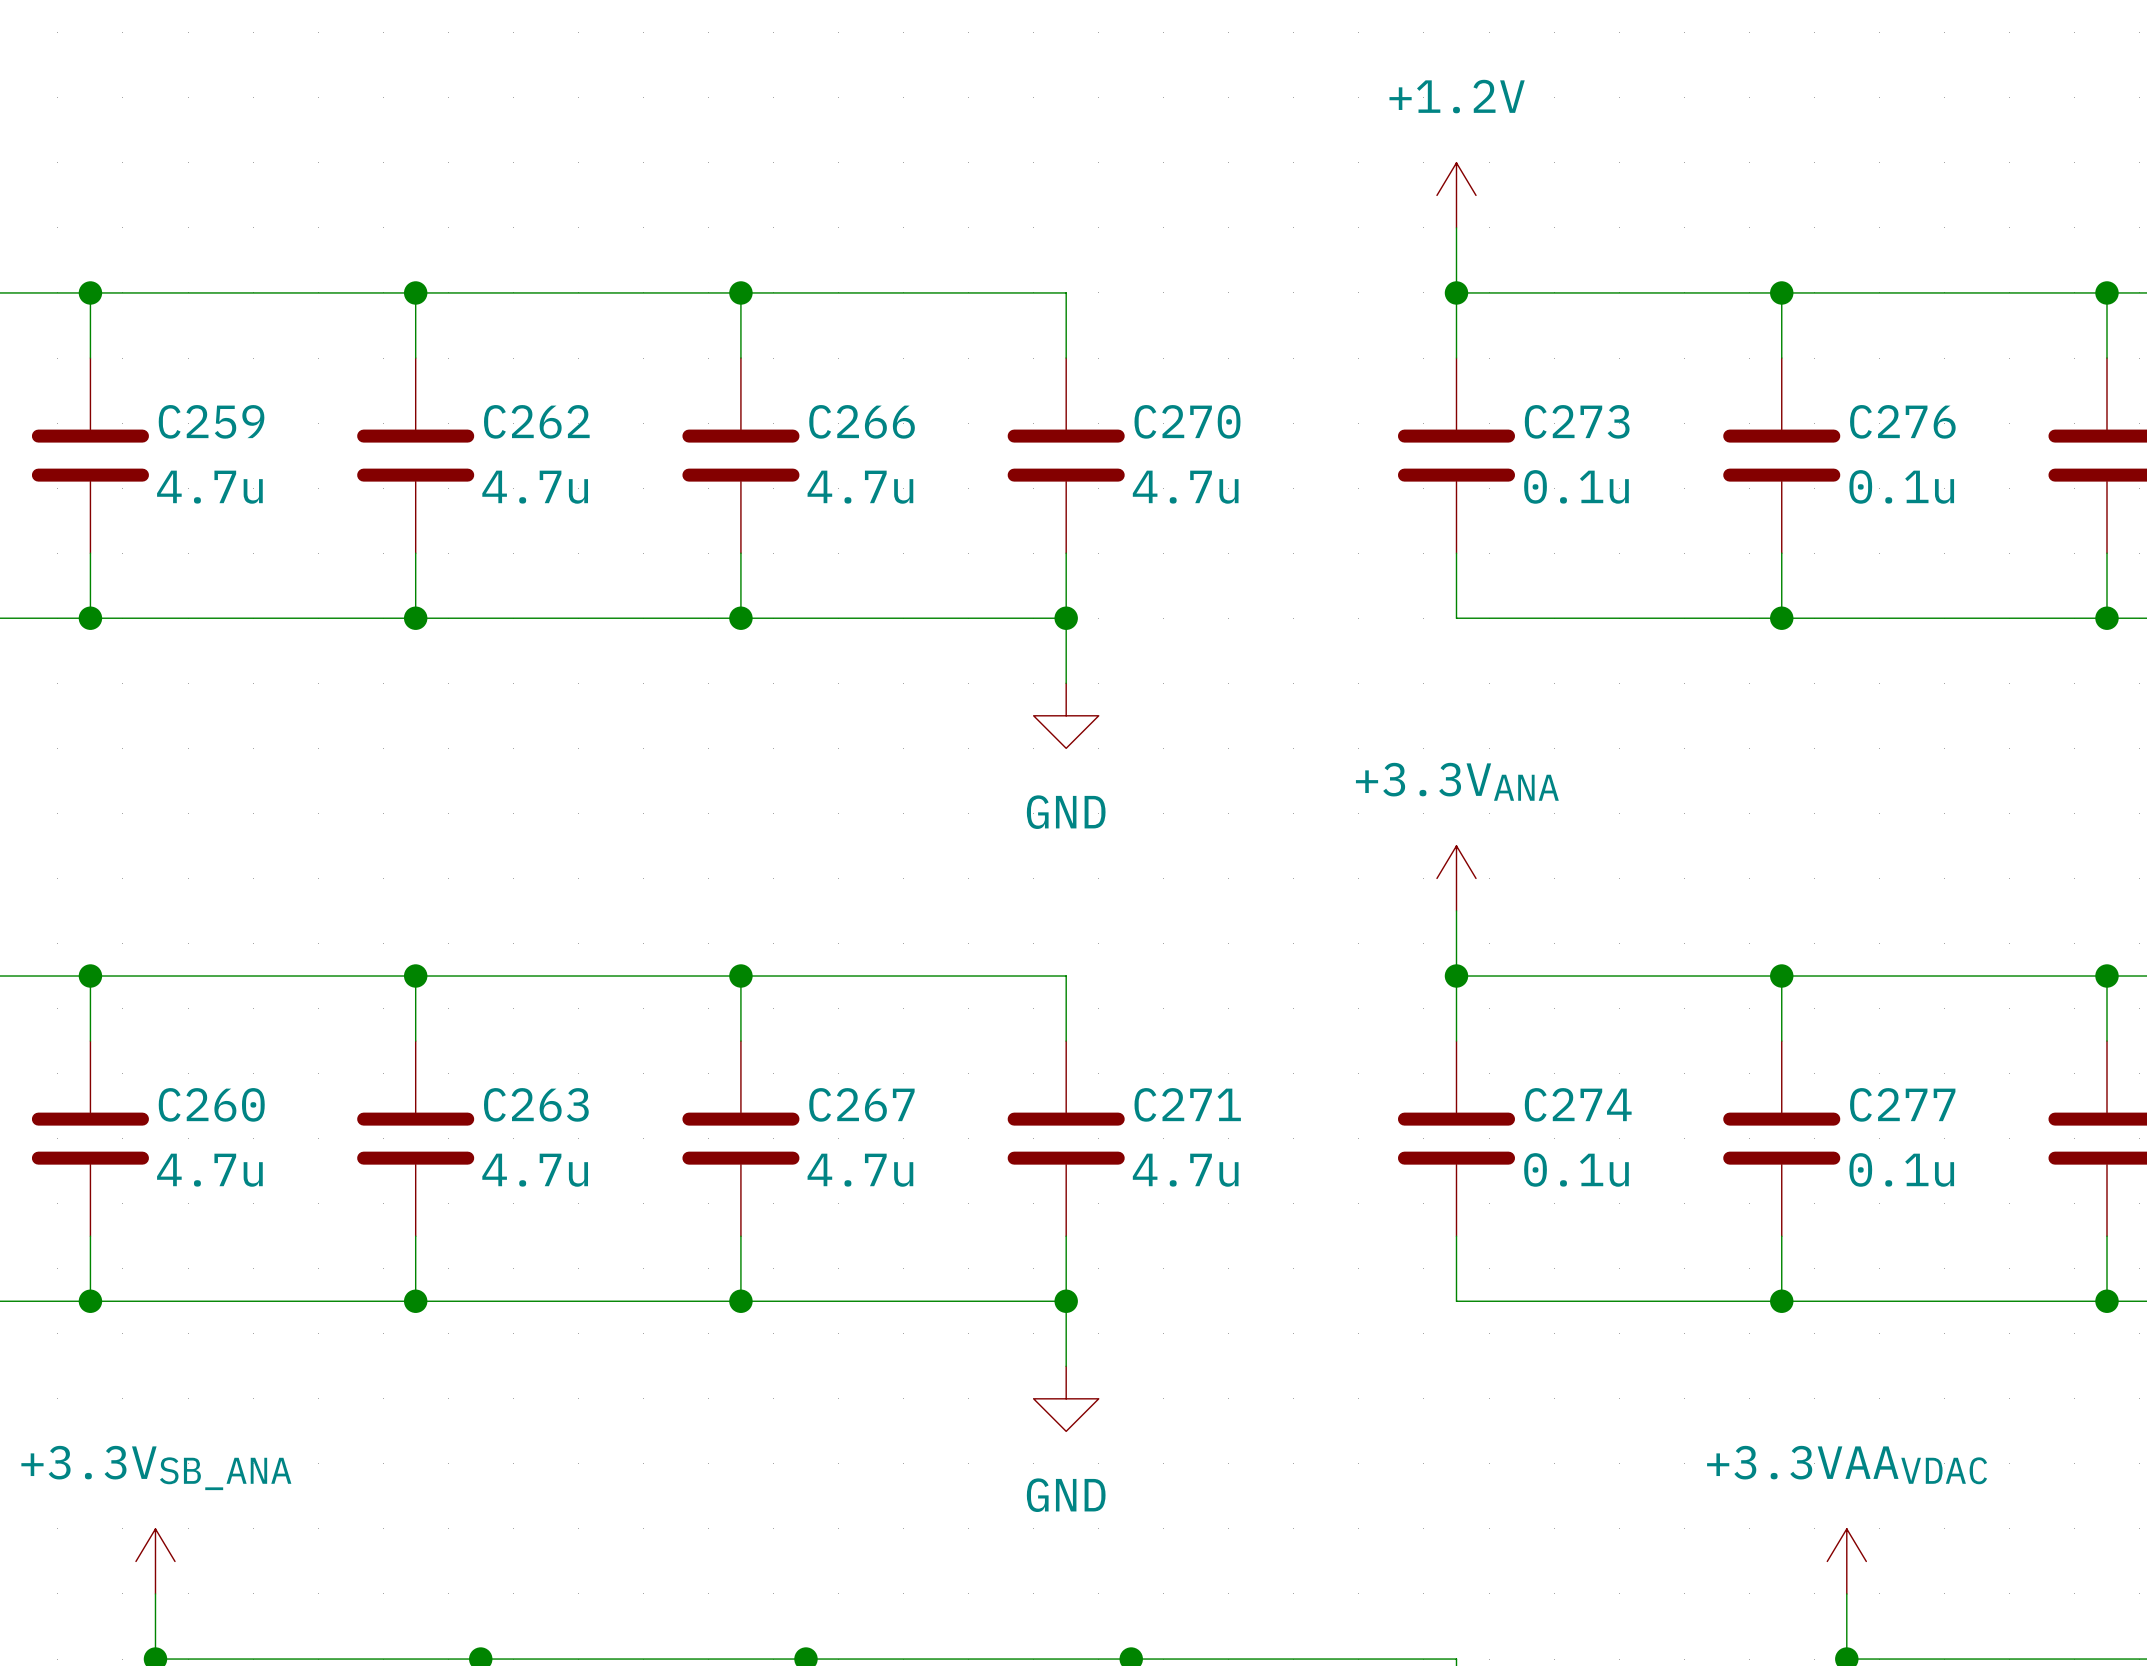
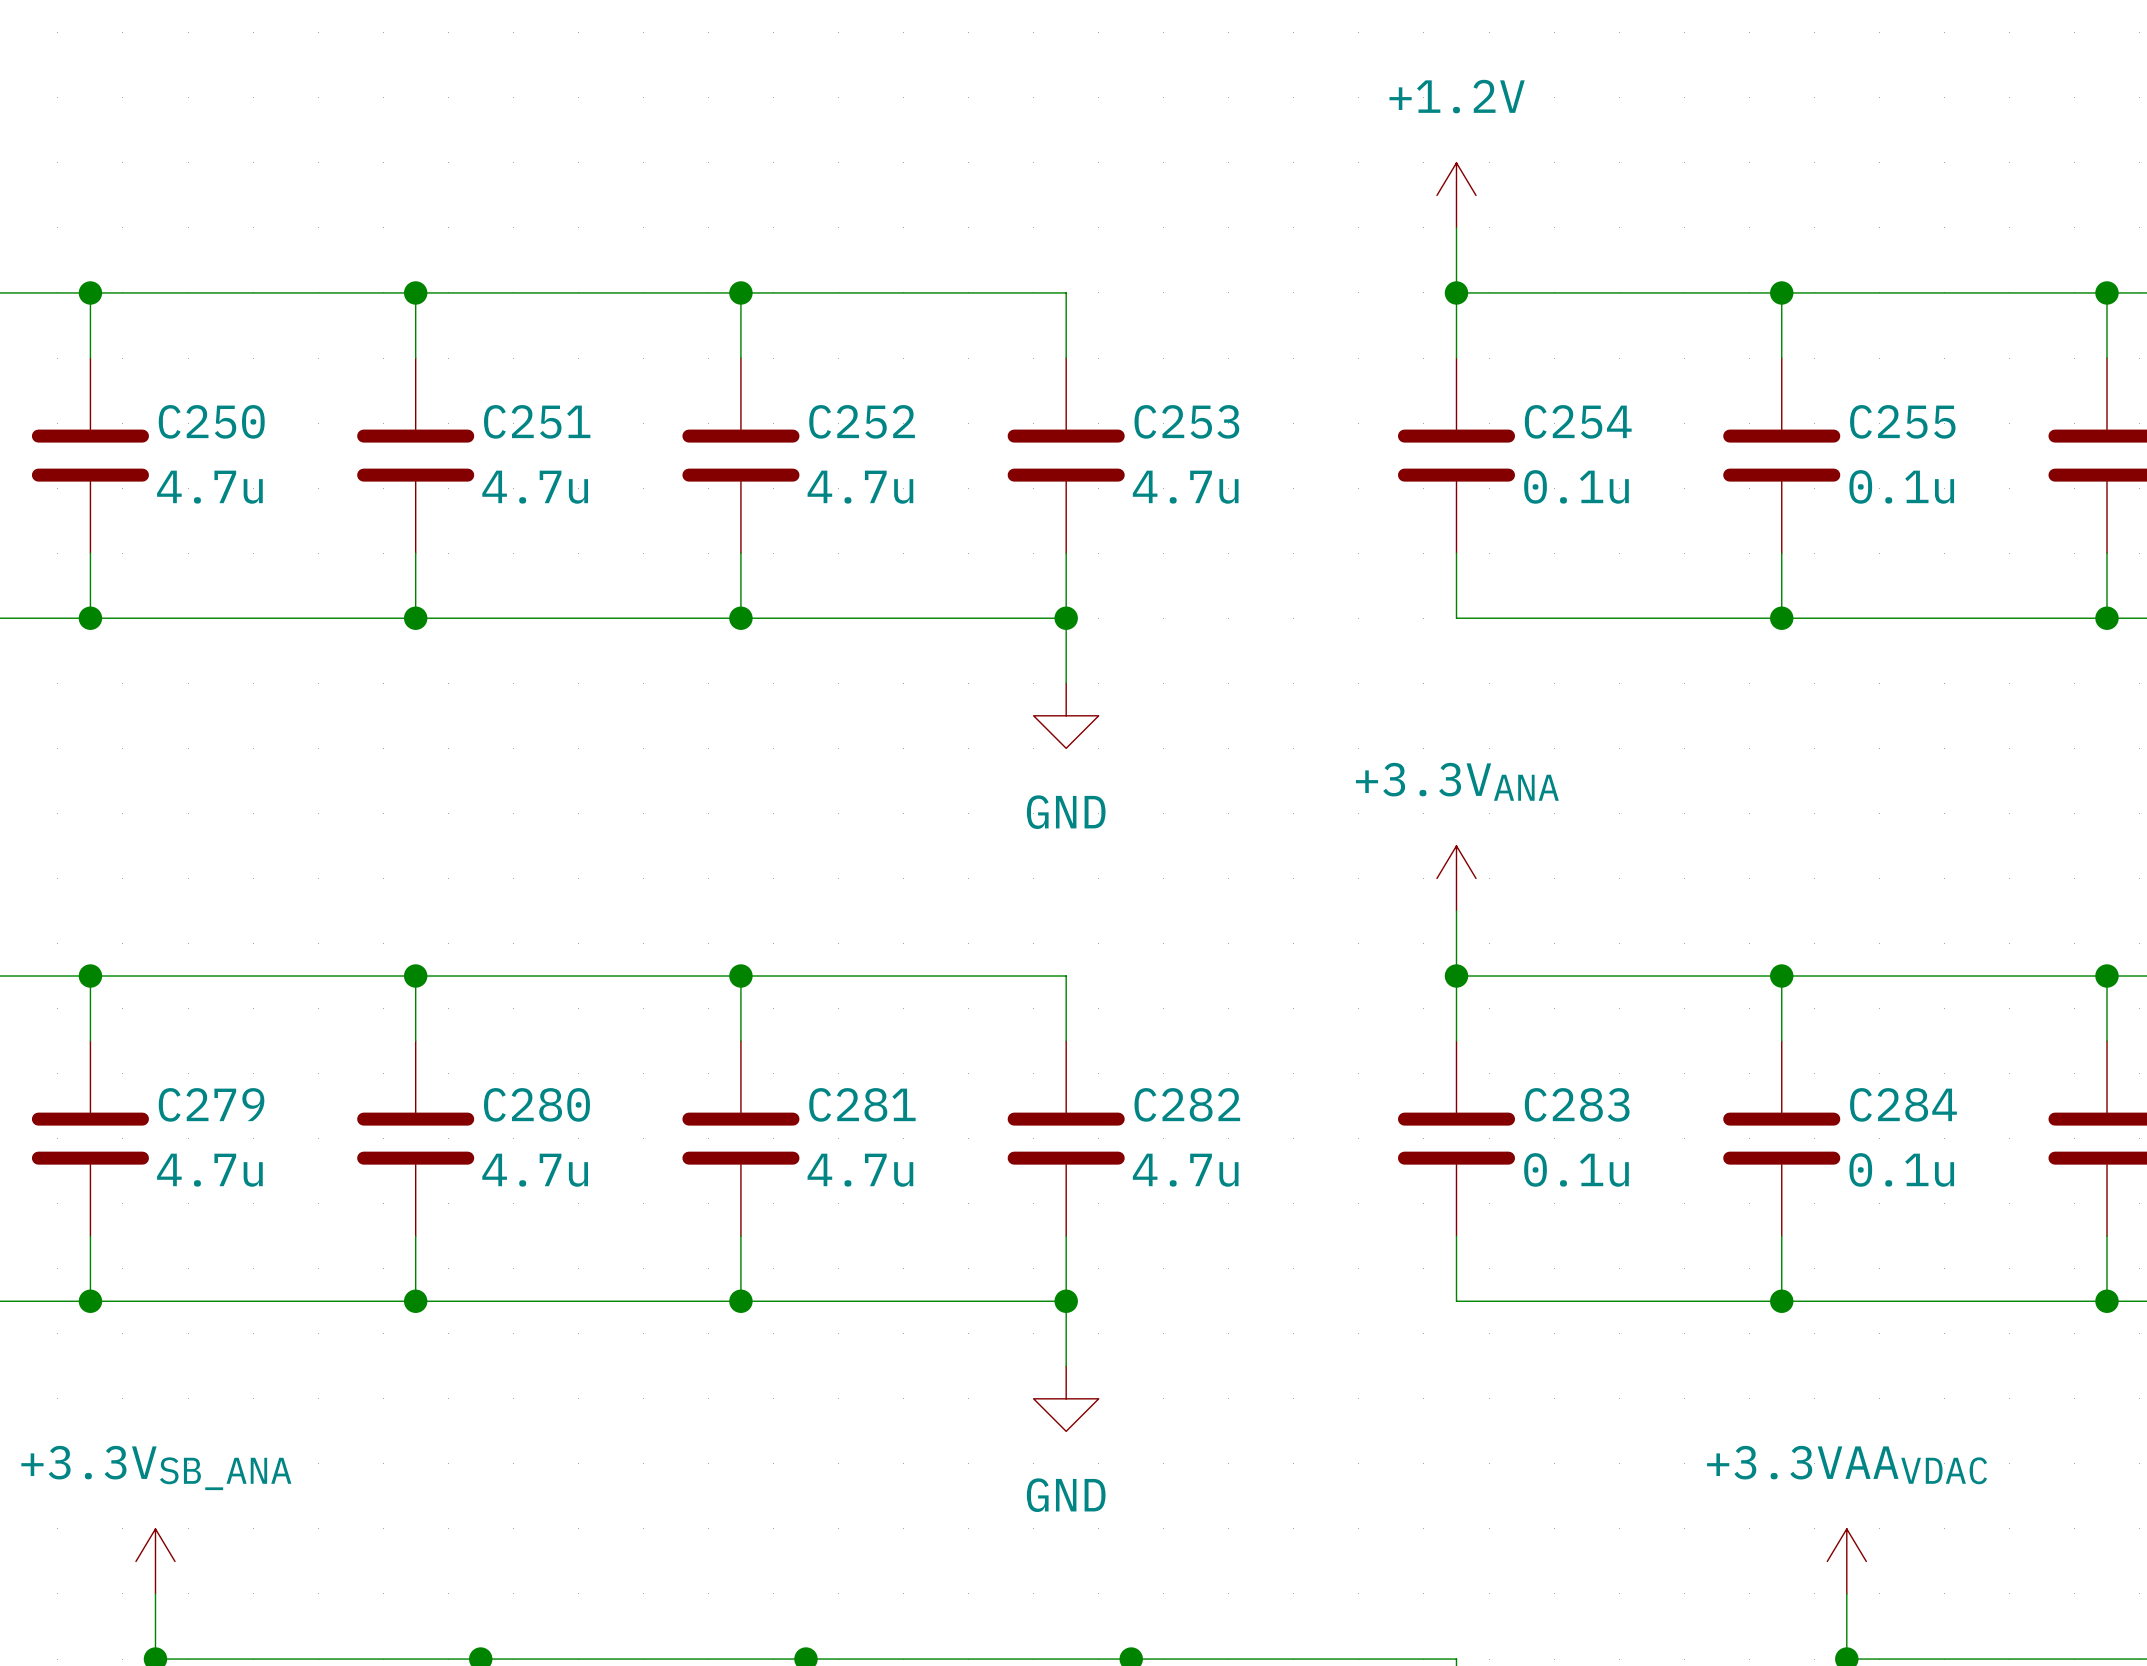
C259 name: C259 (211, 421) -> C250 (211, 421)
C262 name: C262 (536, 421) -> C251 (537, 421)
C266 name: C266 (862, 421) -> C252 (862, 421)
C270 name: C270 (1187, 421) -> C253 (1186, 421)
C273 name: C273 (1577, 421) -> C254 (1578, 421)
C276 name: C276 (1902, 421) -> C255 (1902, 421)
C260 name: C260 (211, 1104) -> C279 (211, 1104)
C263 name: C263 (536, 1104) -> C280 (536, 1104)
C267 name: C267 (861, 1104) -> C281 (862, 1104)
C271 name: C271 (1187, 1104) -> C282 (1187, 1104)
C274 name: C274 (1578, 1104) -> C283 (1577, 1104)
C277 name: C277 (1902, 1104) -> C284 (1903, 1104)

